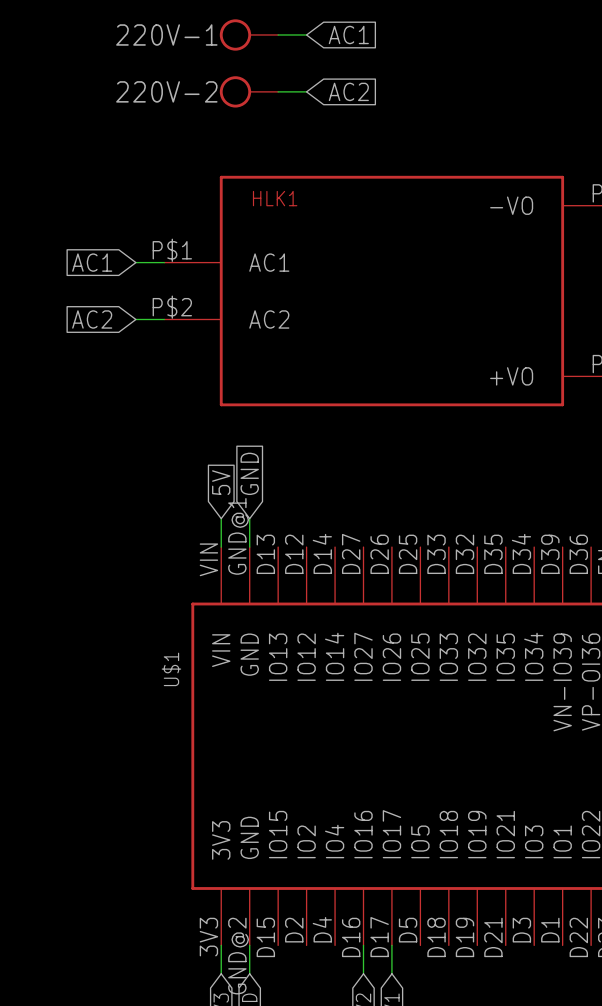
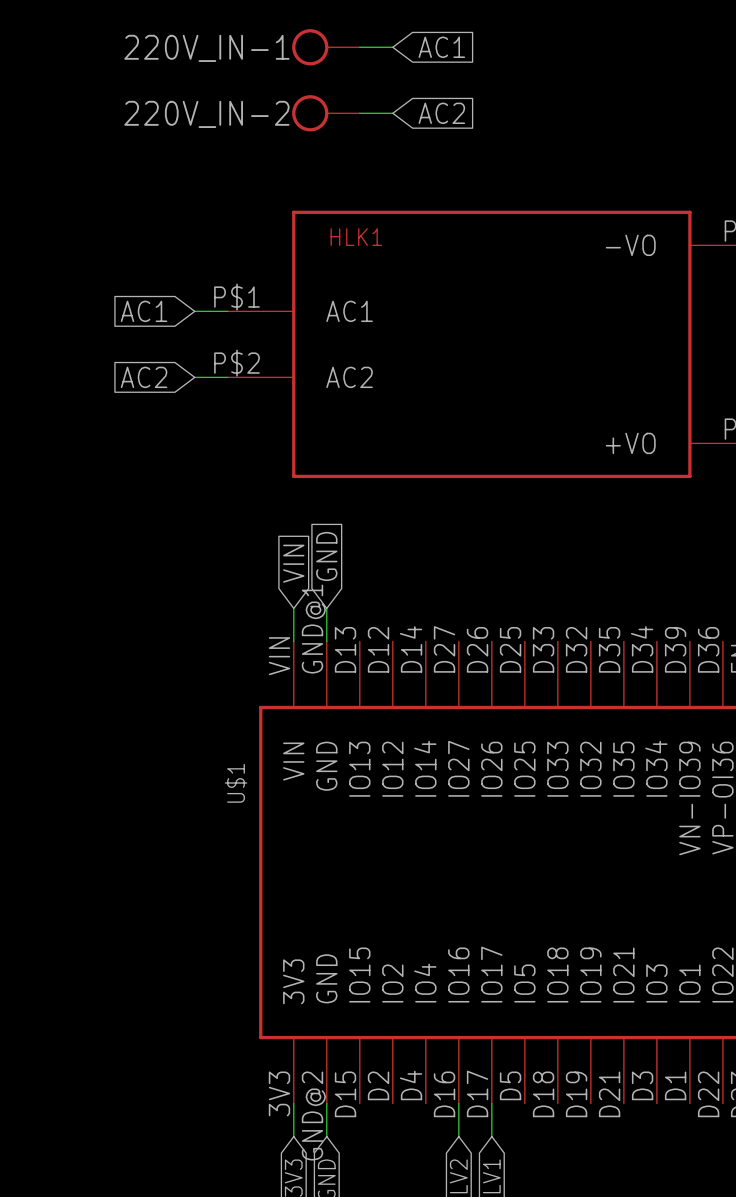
220V-1 name: 220V-1 (166, 34) -> 220V_IN-1 (206, 48)
220V-2 name: 220V-2 (166, 91) -> 220V_IN-2 (206, 114)
global label: 5V (221, 482) -> VIN (293, 563)

